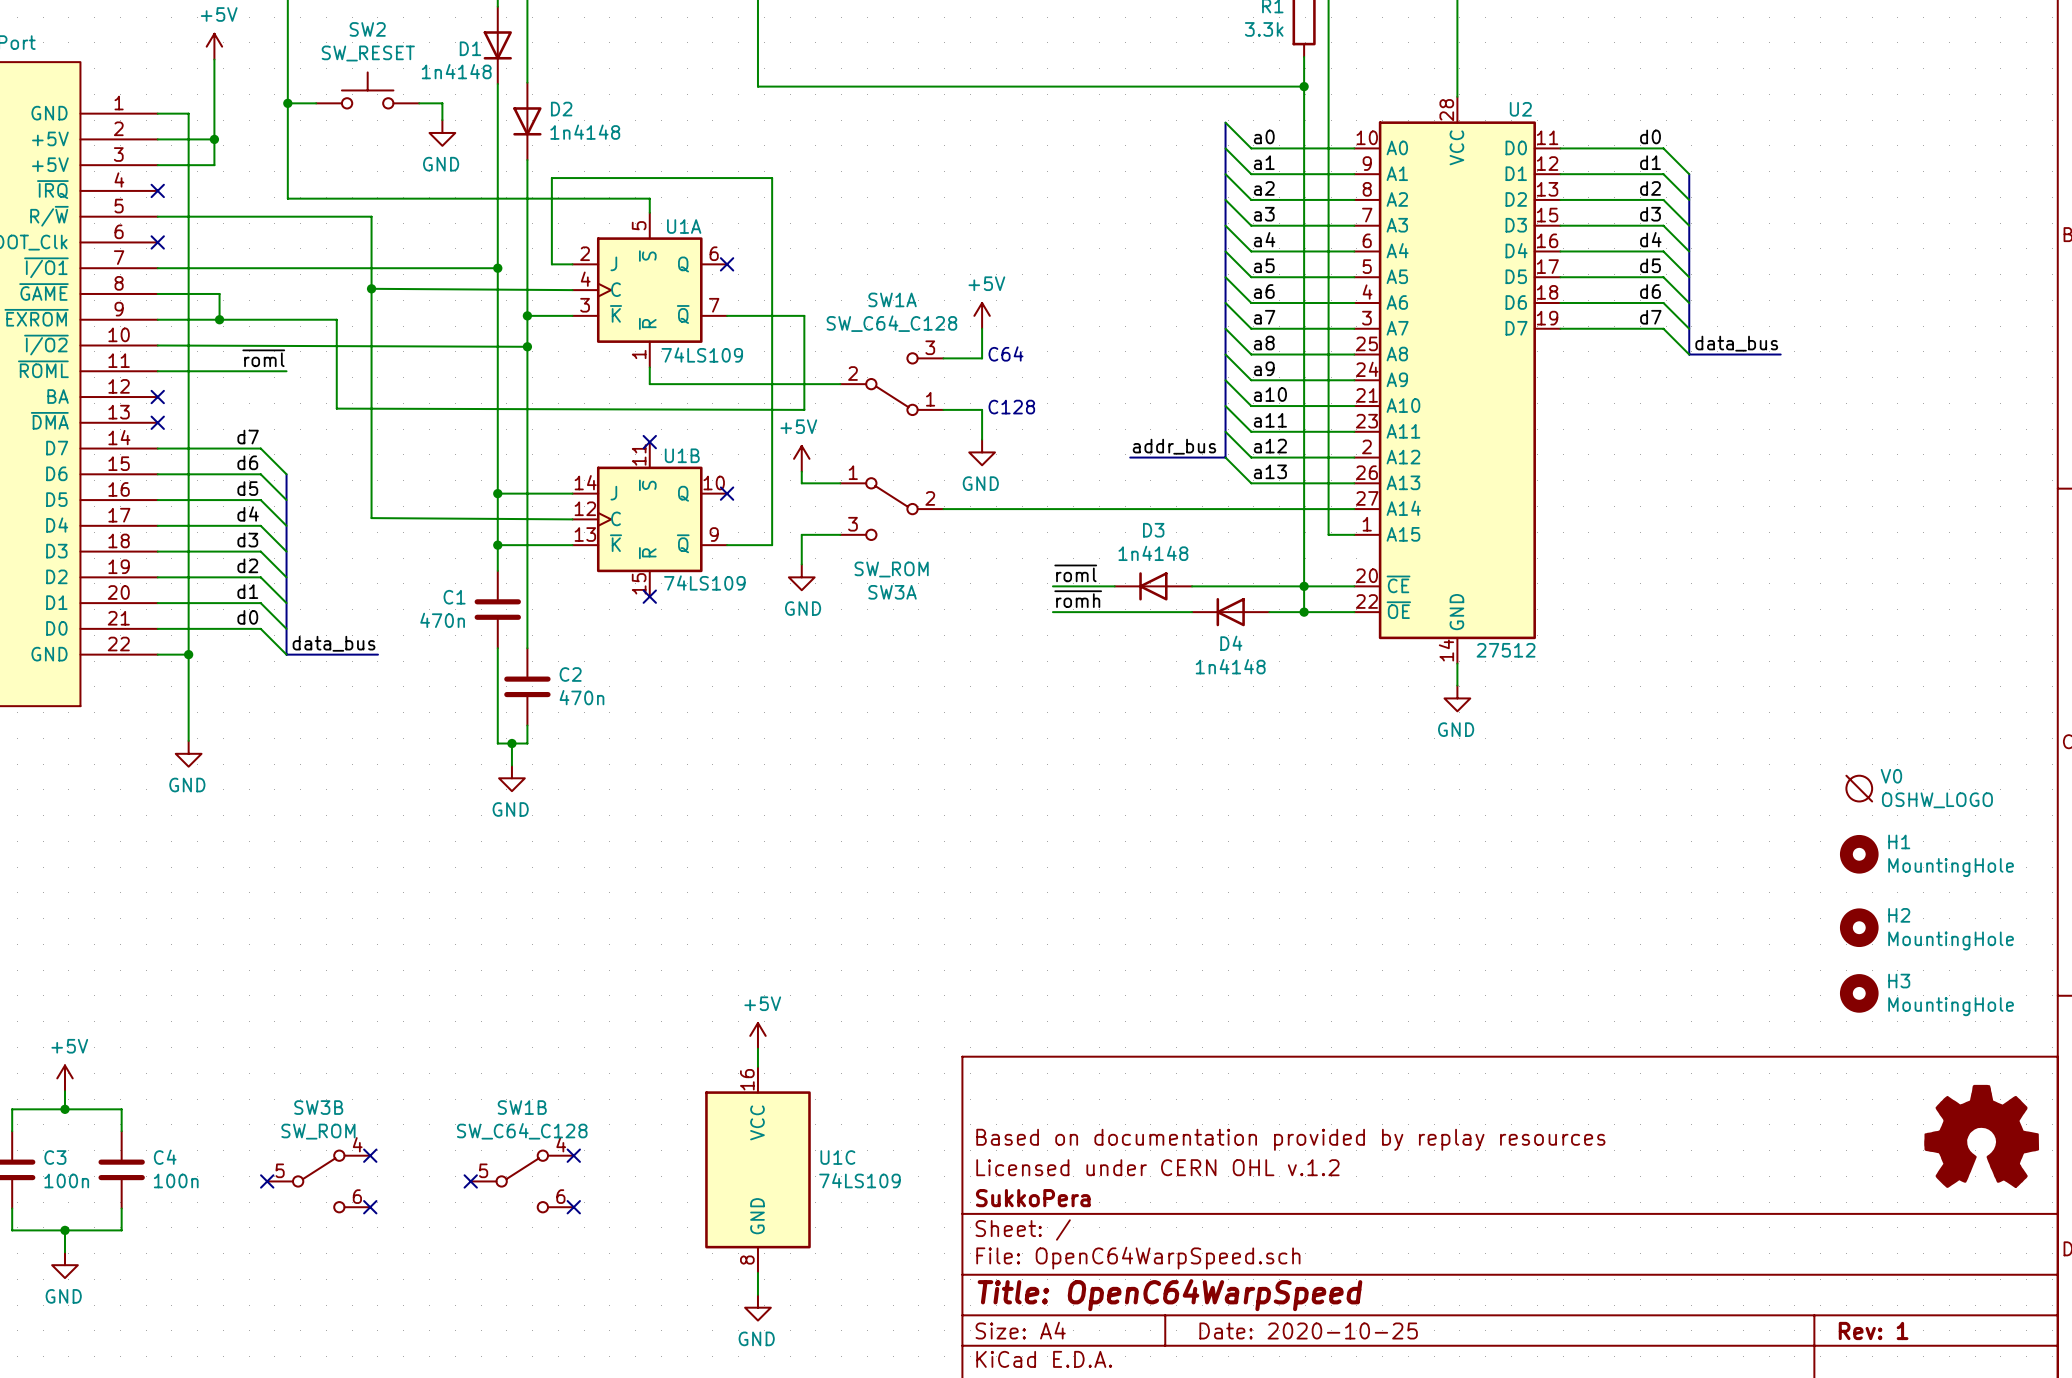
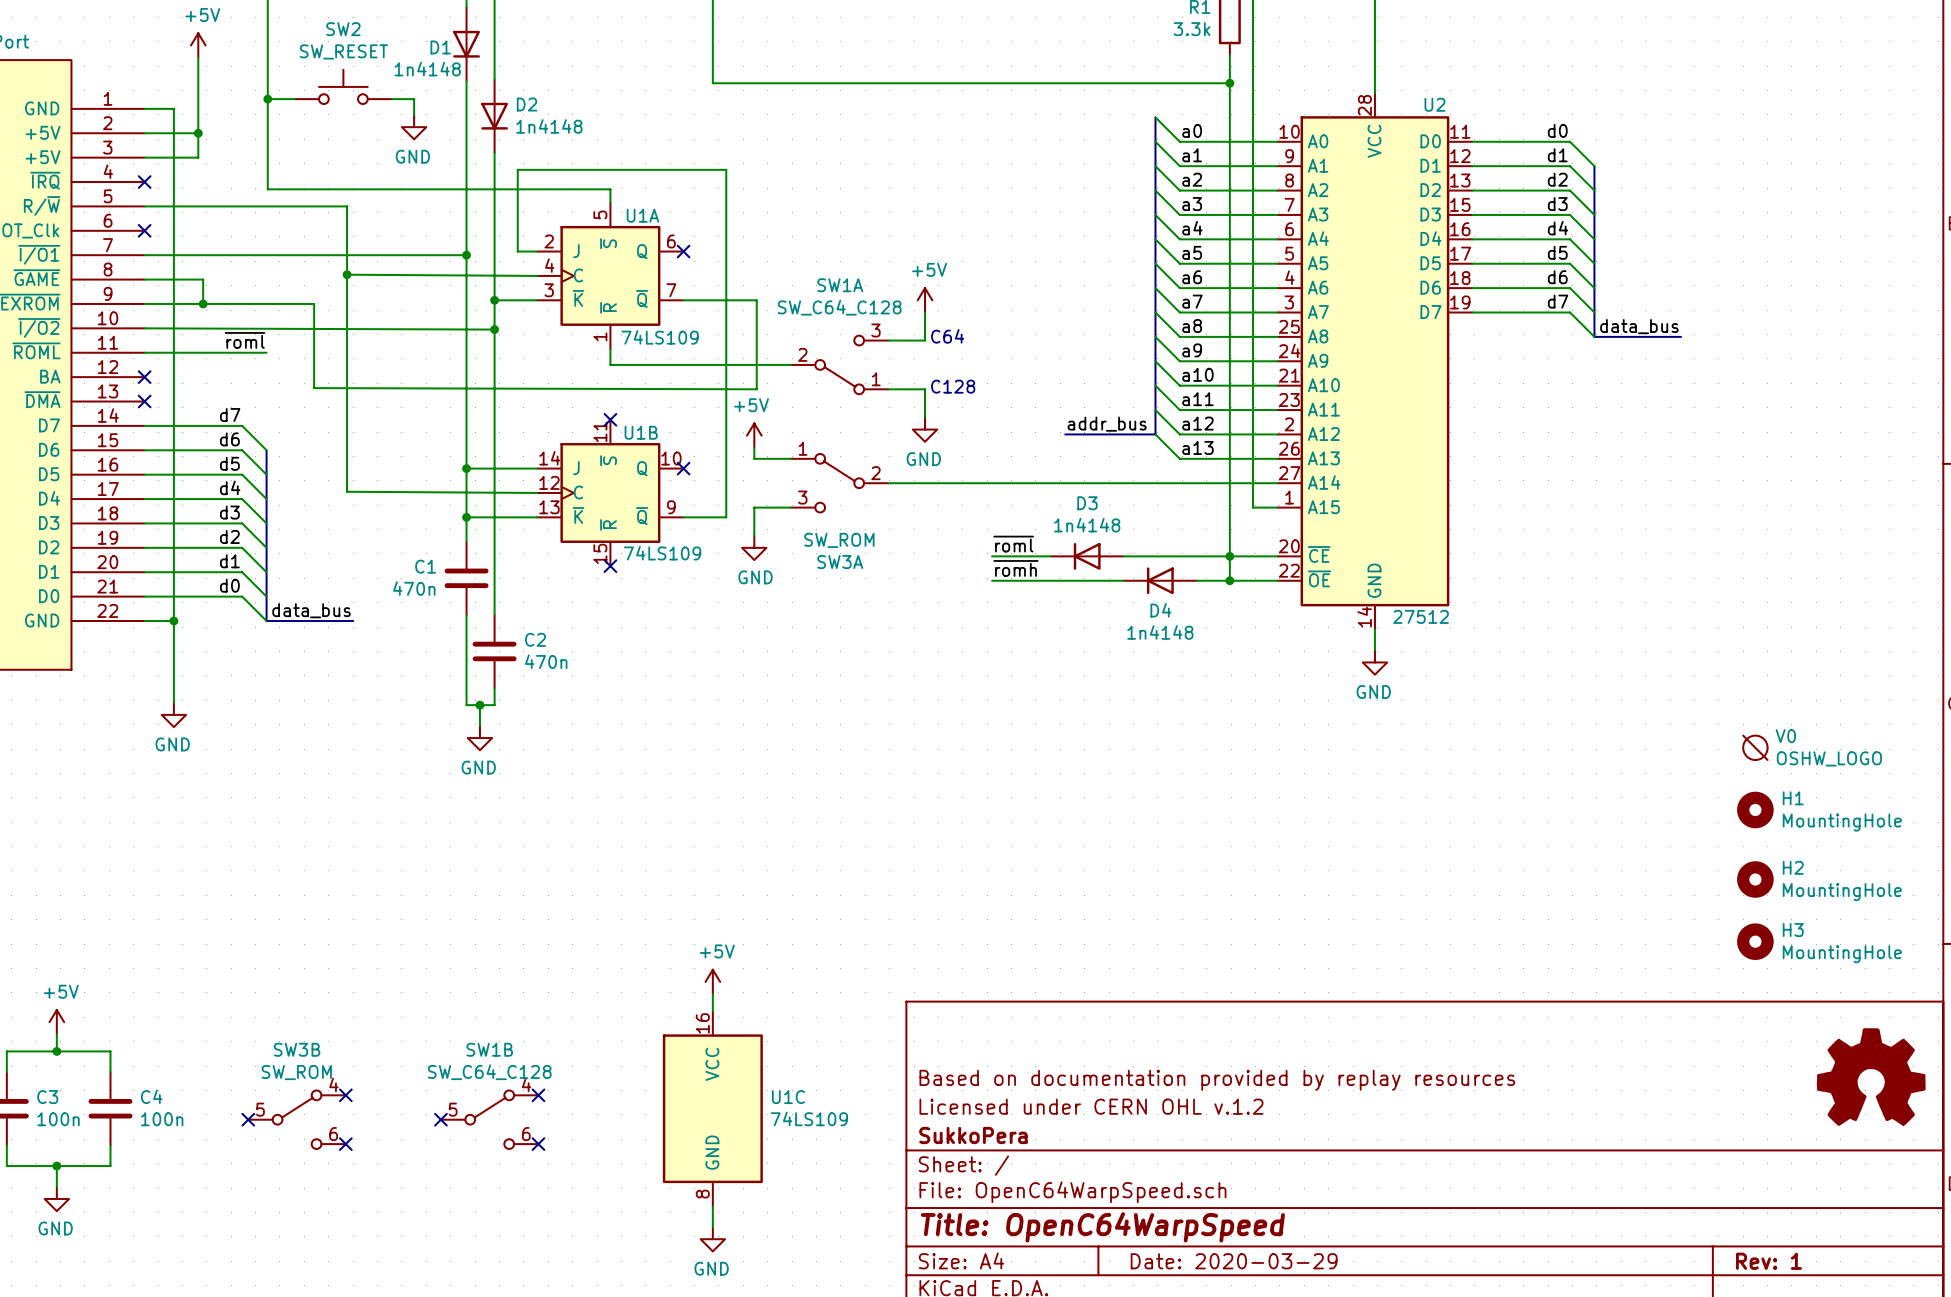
title block: Date: 2020-10-25 (1308, 1330) -> Date: 2020-03-29 (1234, 1261)

